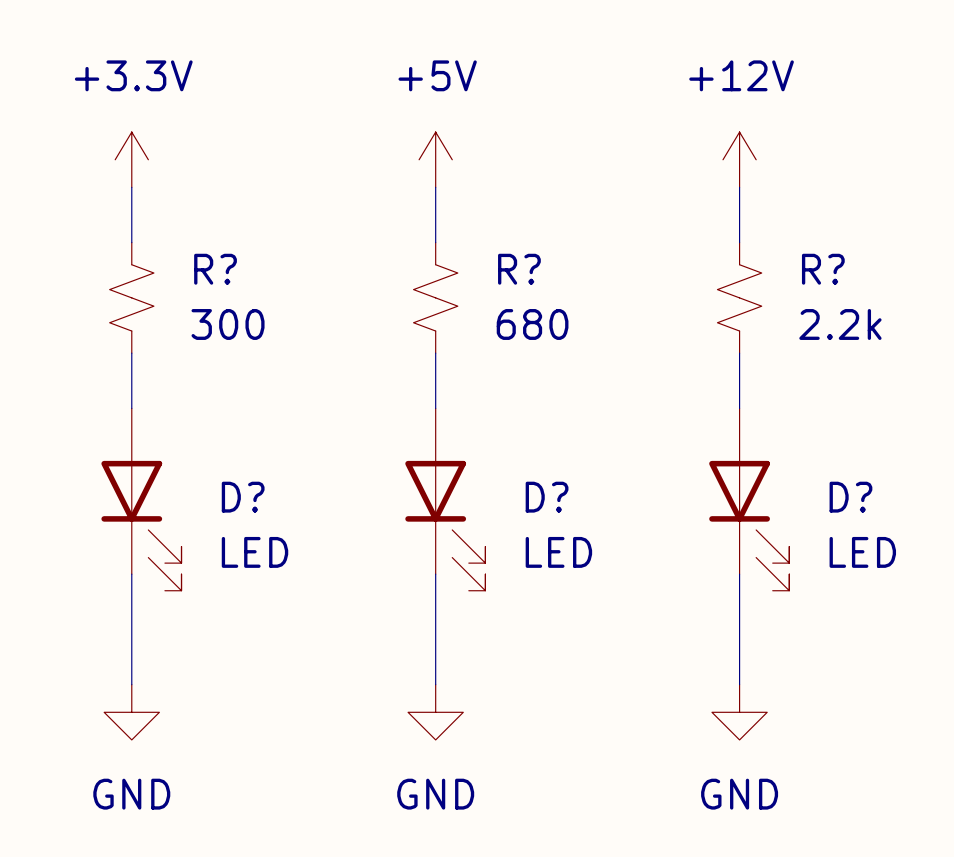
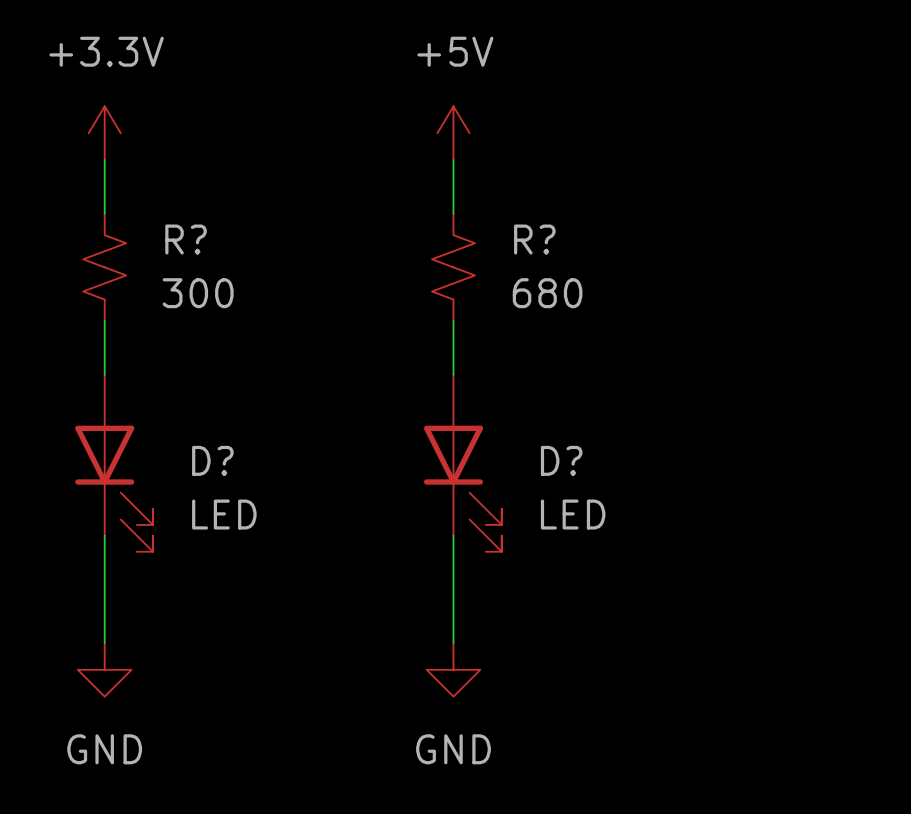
power symbol position: +5V (435, 159) -> +5V (453, 133)
power symbol: +12V (739, 159) -> none
wire: (435, 187) (435, 242) -> (453, 160) (453, 213)
wire: (739, 187) (739, 242) -> none
R? position: (435, 297) -> (453, 267)
R?: 2.2k (739, 297) -> none
wire: (435, 353) (435, 408) -> (453, 321) (453, 374)
wire: (739, 353) (739, 408) -> none
D? position: (445, 499) -> (462, 463)
D?: LED (749, 499) -> none
wire: (435, 574) (435, 684) -> (453, 535) (453, 642)
wire: (739, 574) (739, 684) -> none
power symbol position: GND (435, 712) -> GND (453, 669)
power symbol: GND (739, 712) -> none

